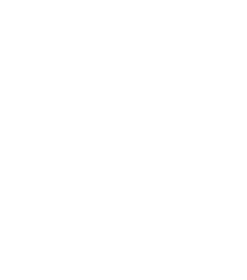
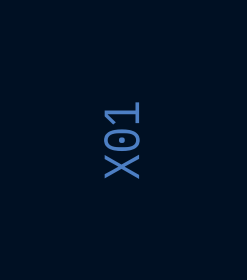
text: none -> X01 (121, 140)

